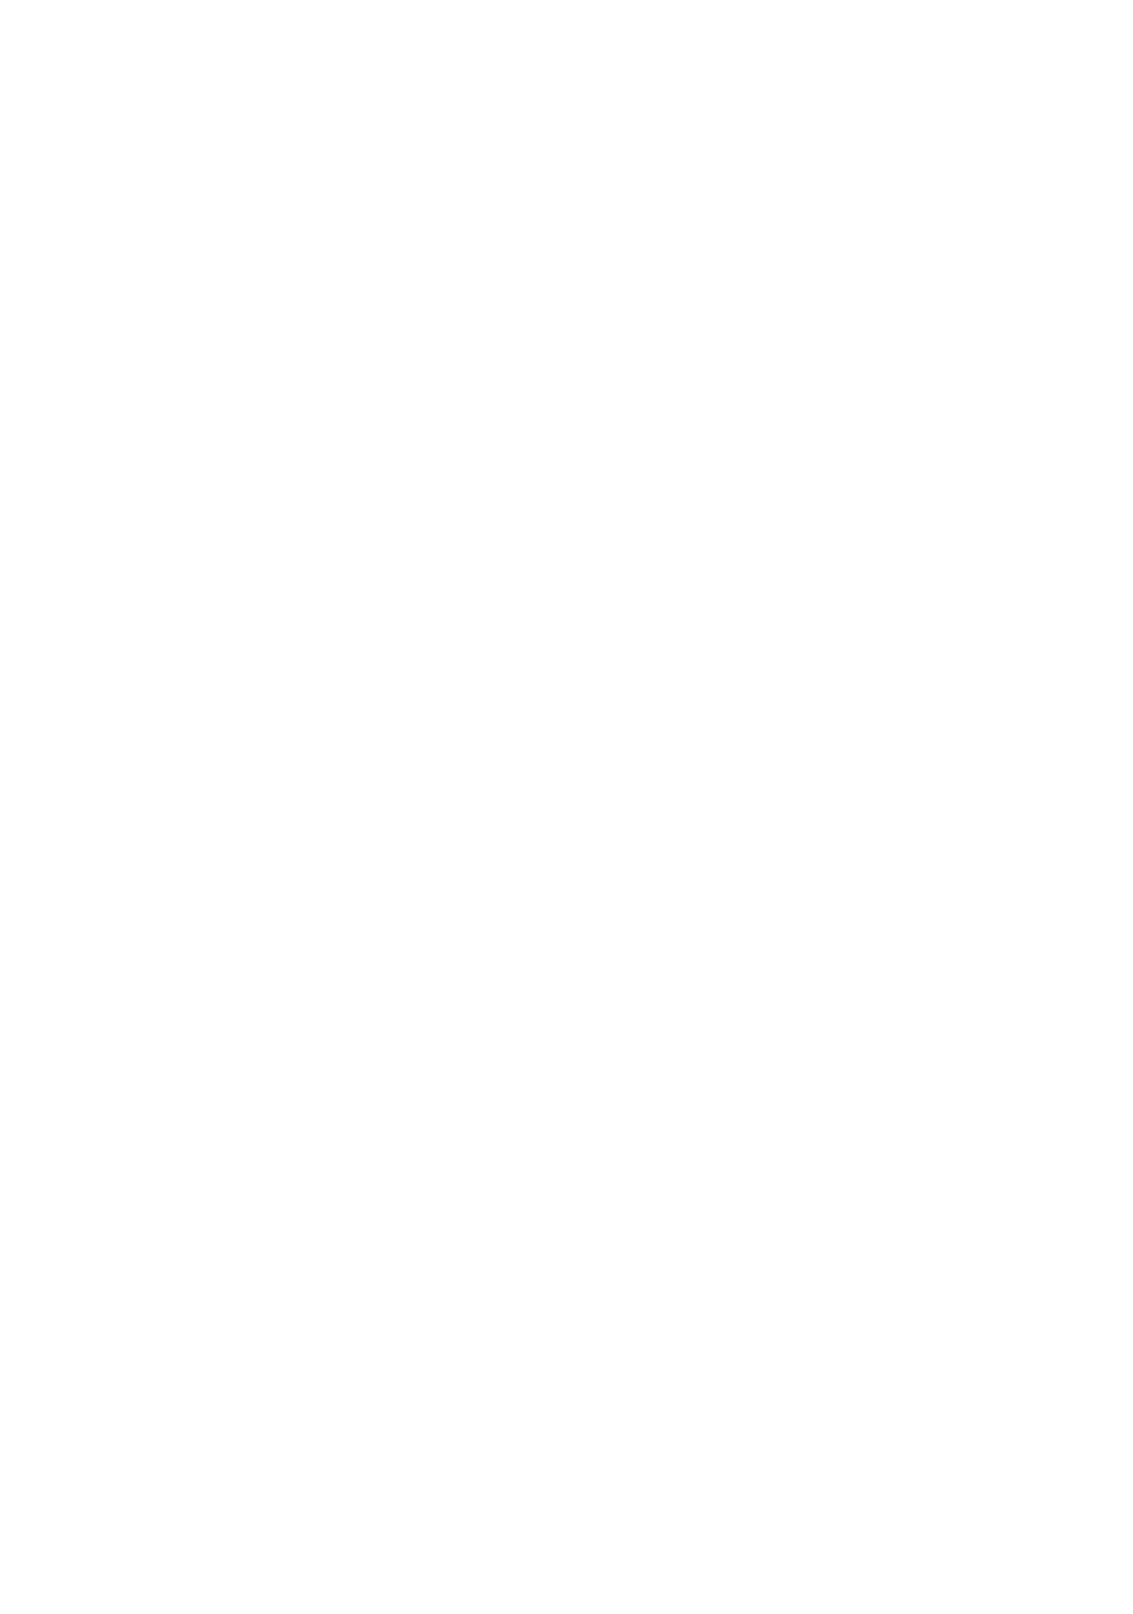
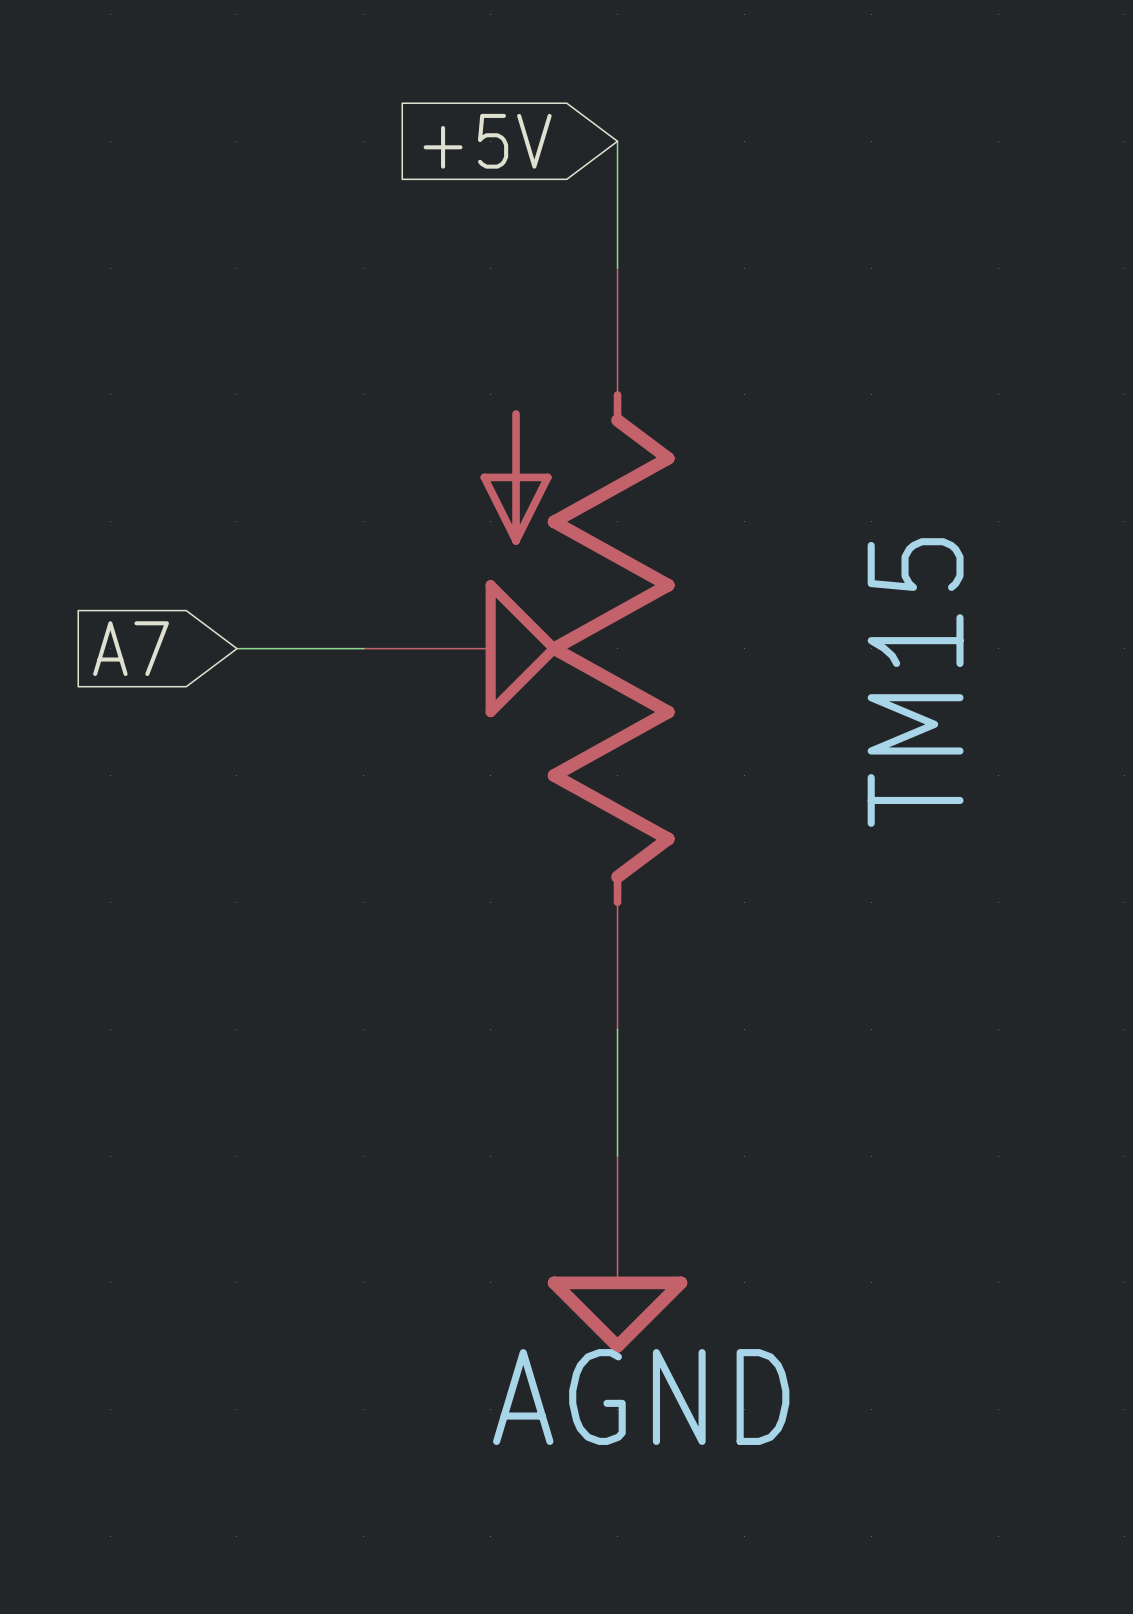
global label: none -> +5V (487, 141)
wire: none -> (617, 141) (617, 268)
global label: none -> A7 (131, 648)
wire: none -> (236, 648) (363, 648)
TM15: none -> (519, 648)
wire: none -> (617, 1029) (617, 1156)
power symbol: none -> AGND (617, 1254)

